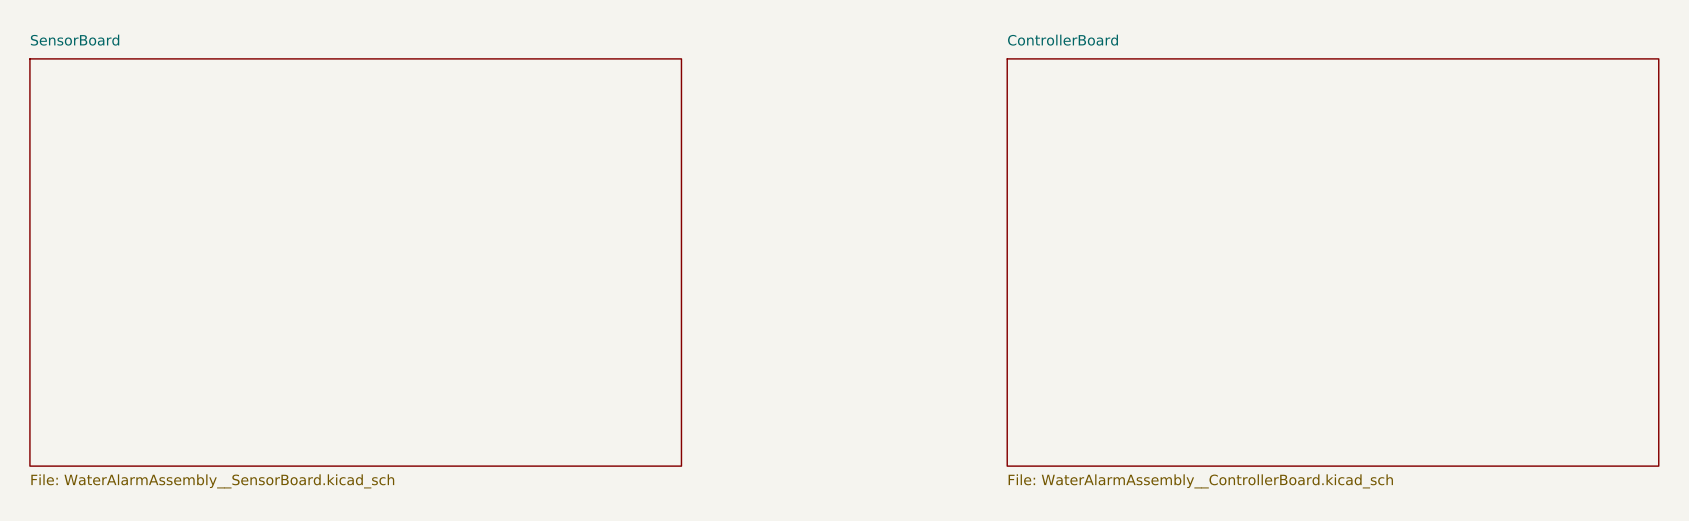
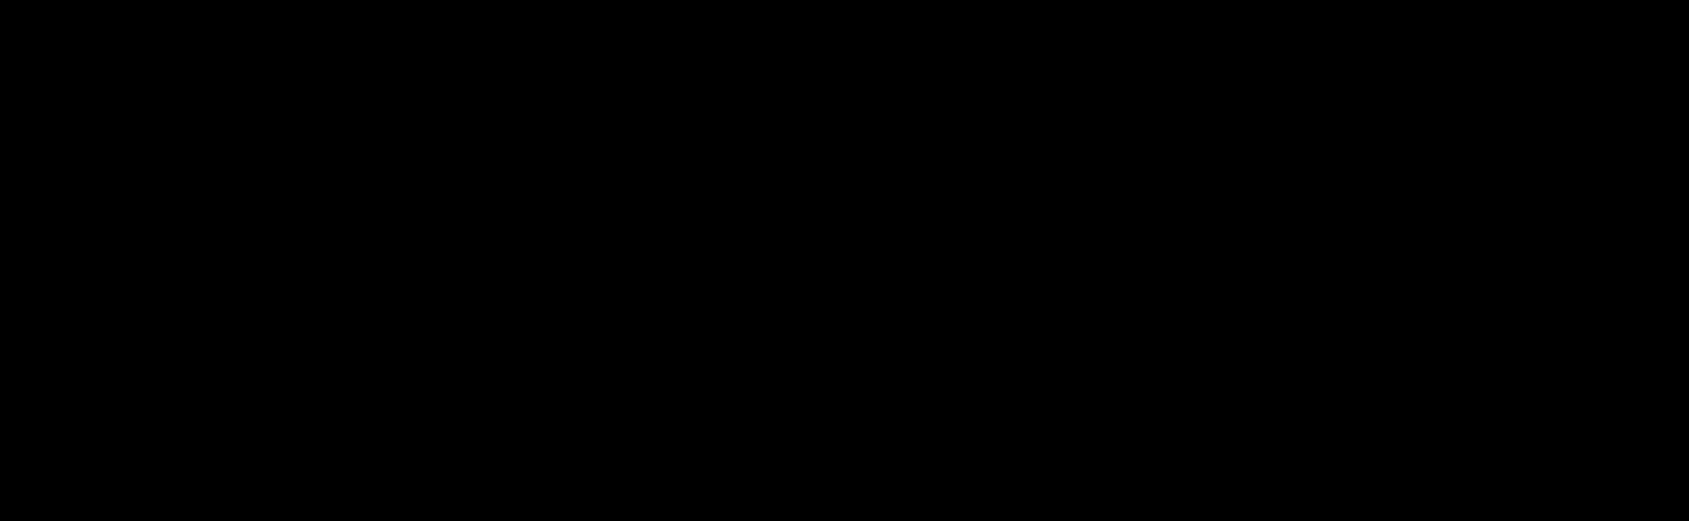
sheet SensorBoard: File: WaterAlarmAssembly__SensorBoard.kicad_sch (355, 262) -> none
sheet ControllerBoard: File: WaterAlarmAssembly__ControllerBoard.kicad_sch (1332, 262) -> none

